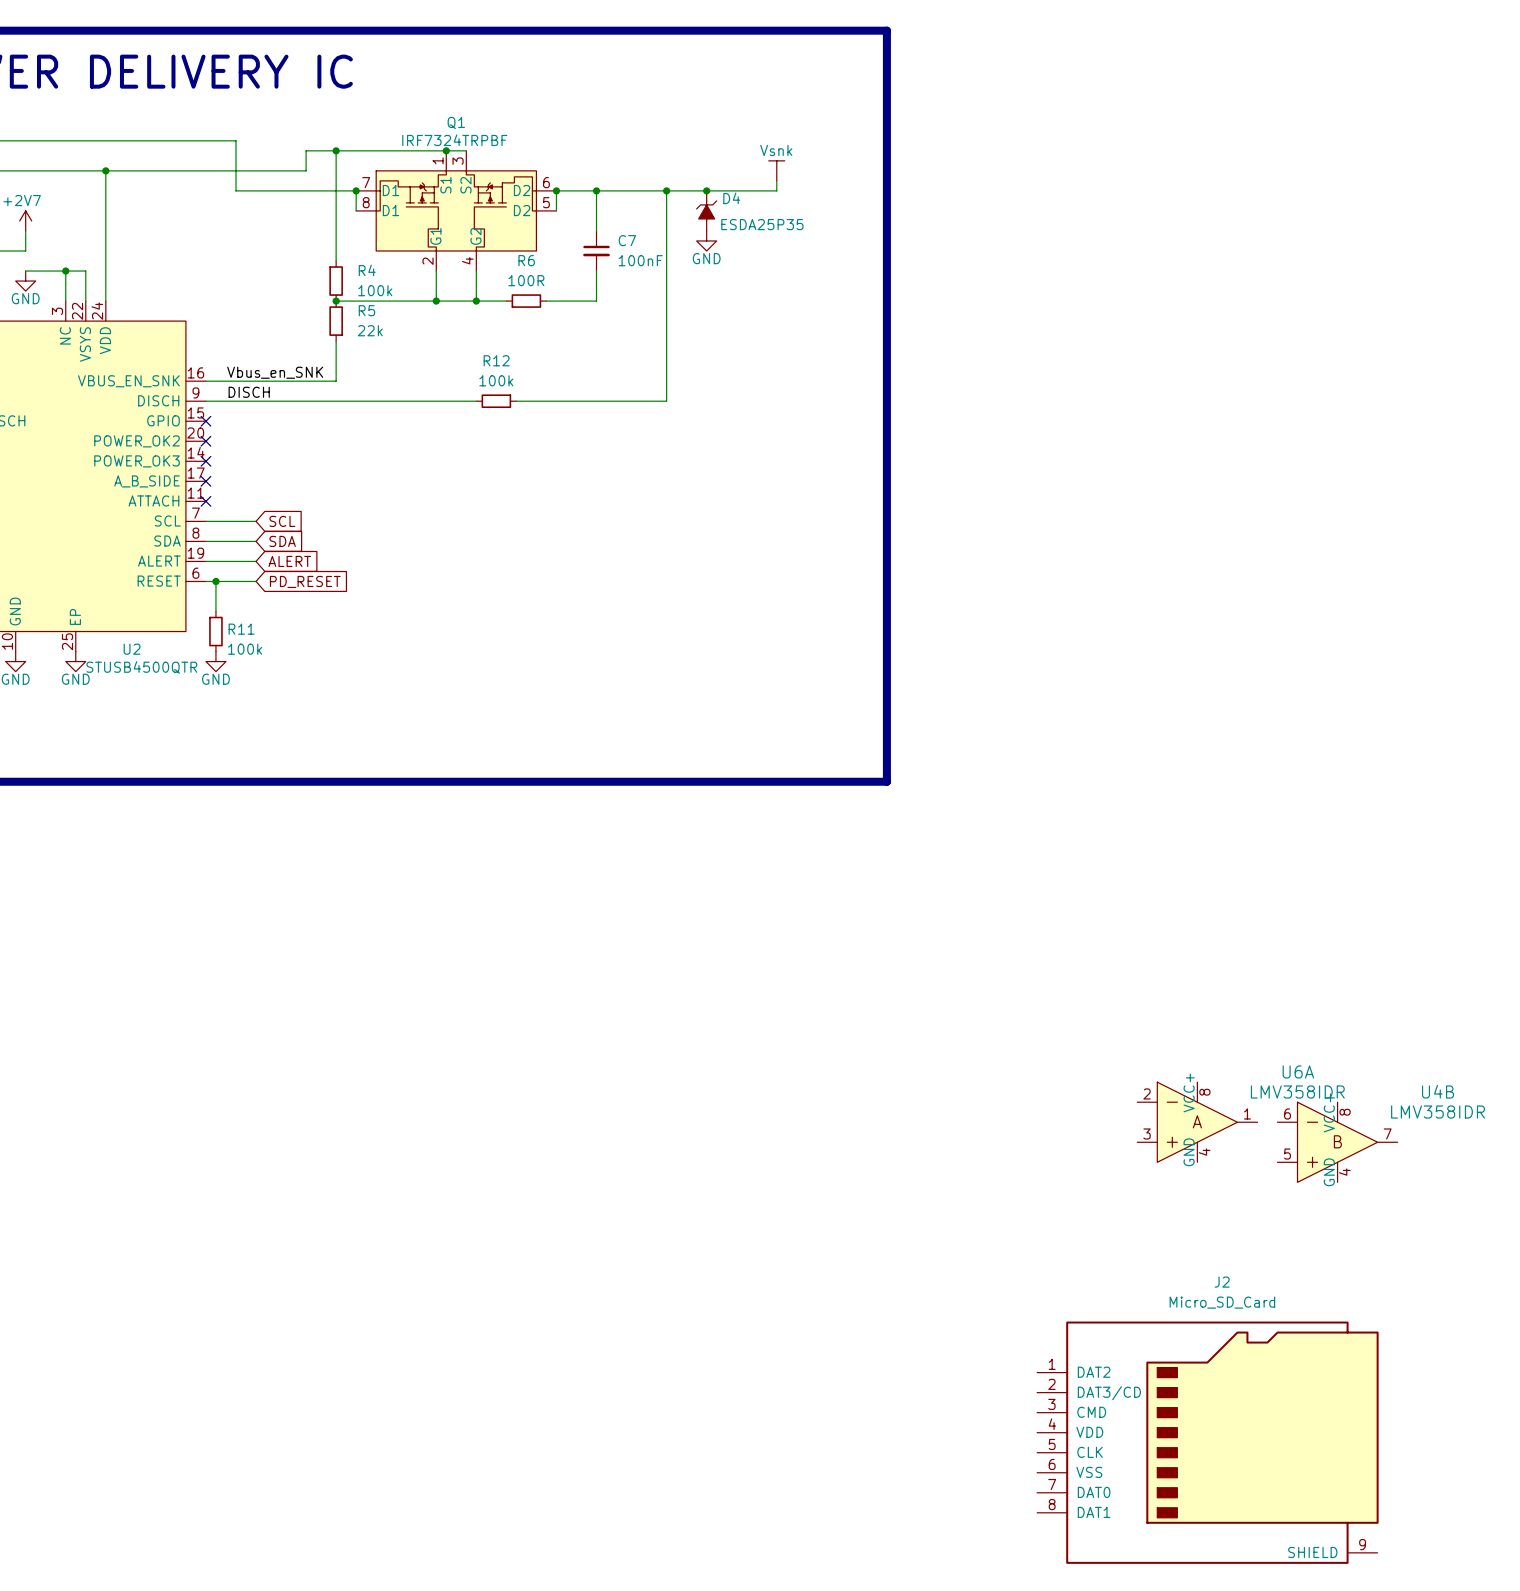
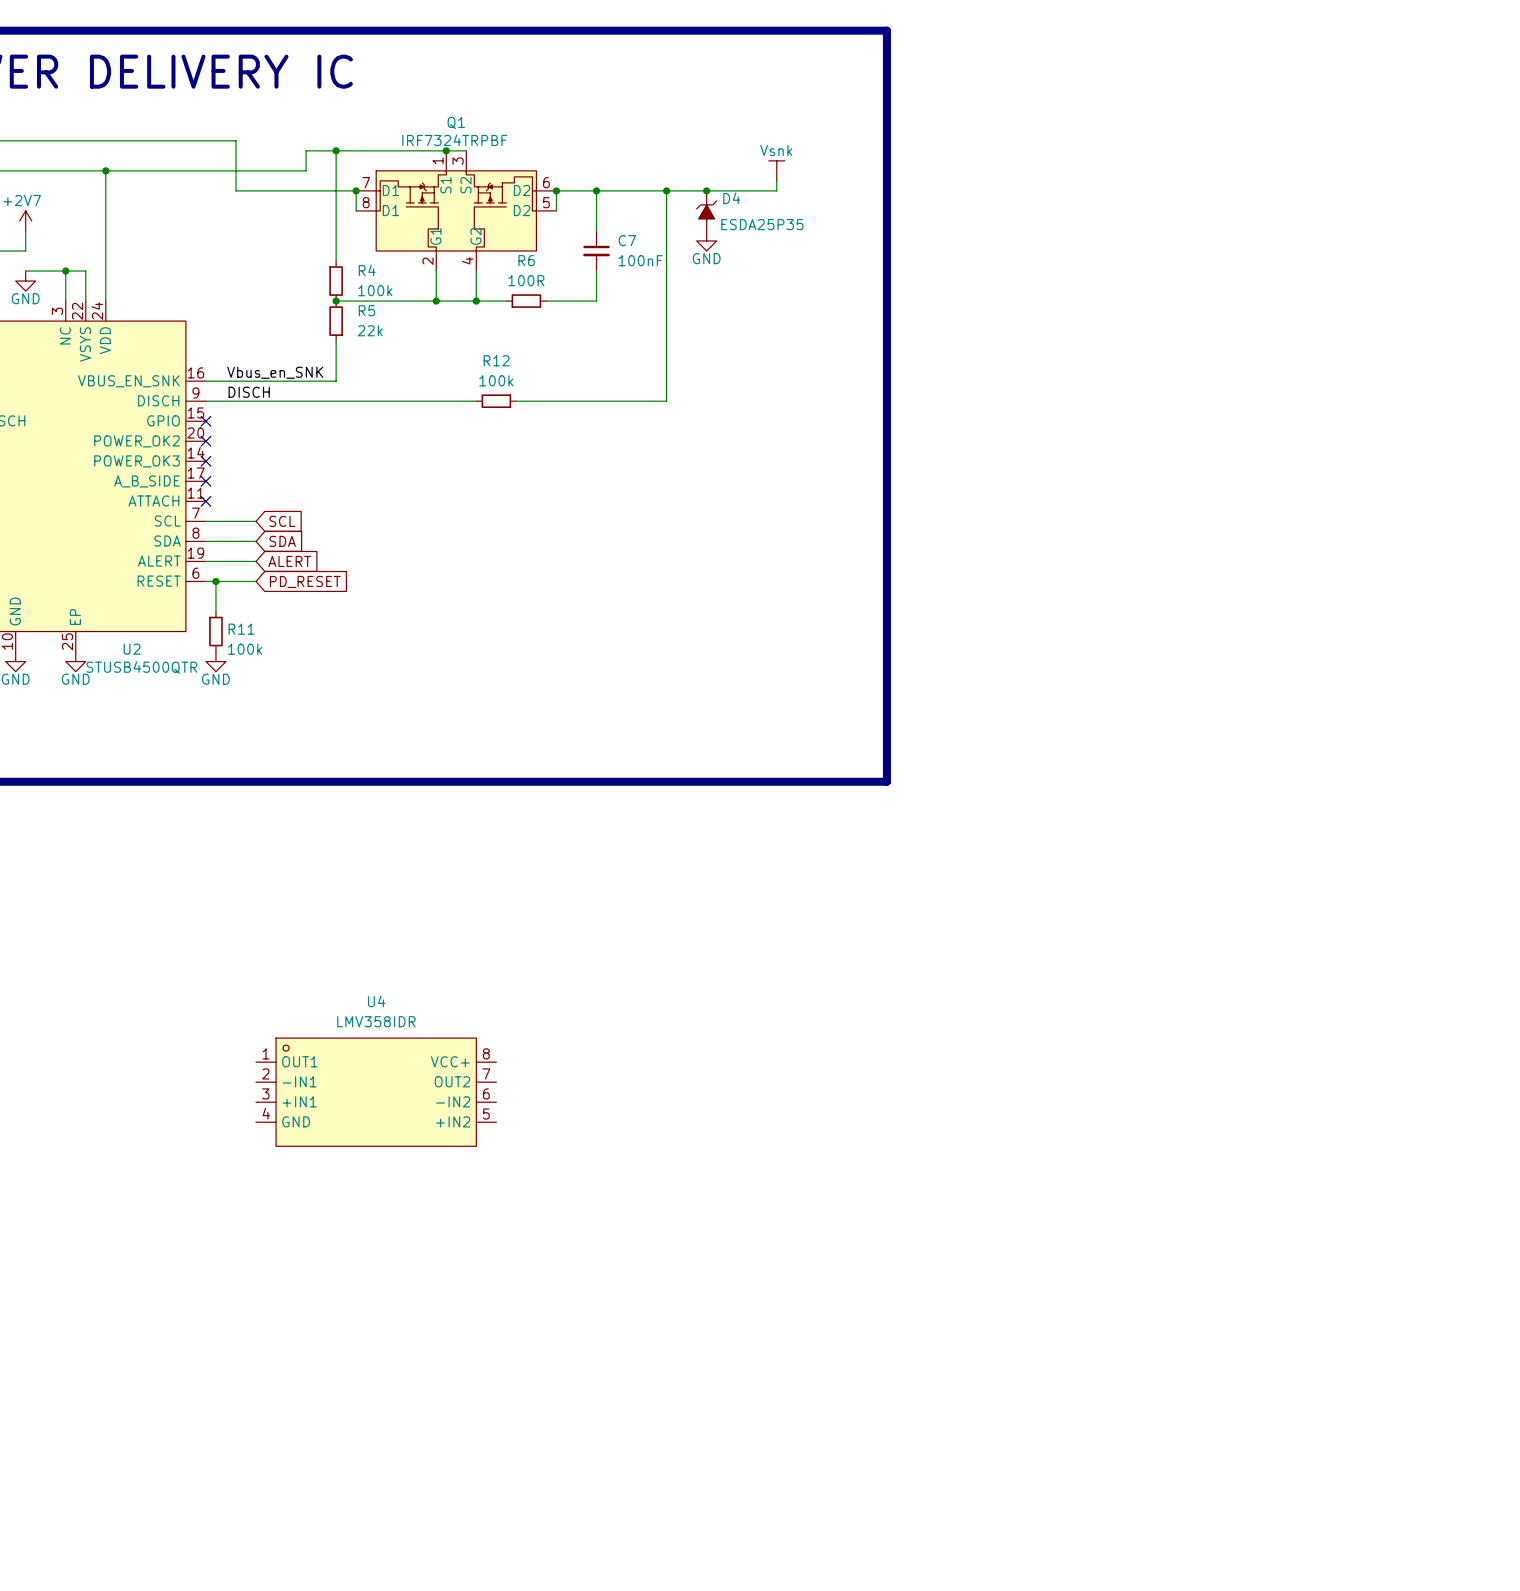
U4: none -> LMV358IDR (376, 1092)
U6A: LMV358IDR (1197, 1122) -> none
U4B: LMV358IDR (1337, 1142) -> none
J2: Micro_SD_Card (1207, 1442) -> none

